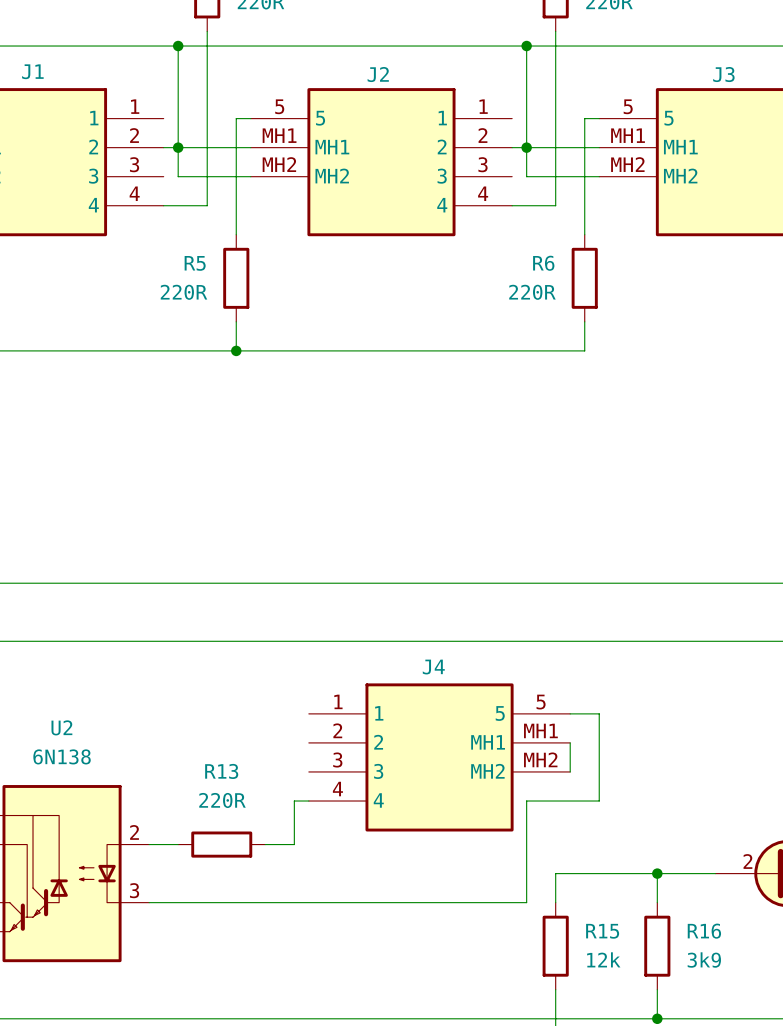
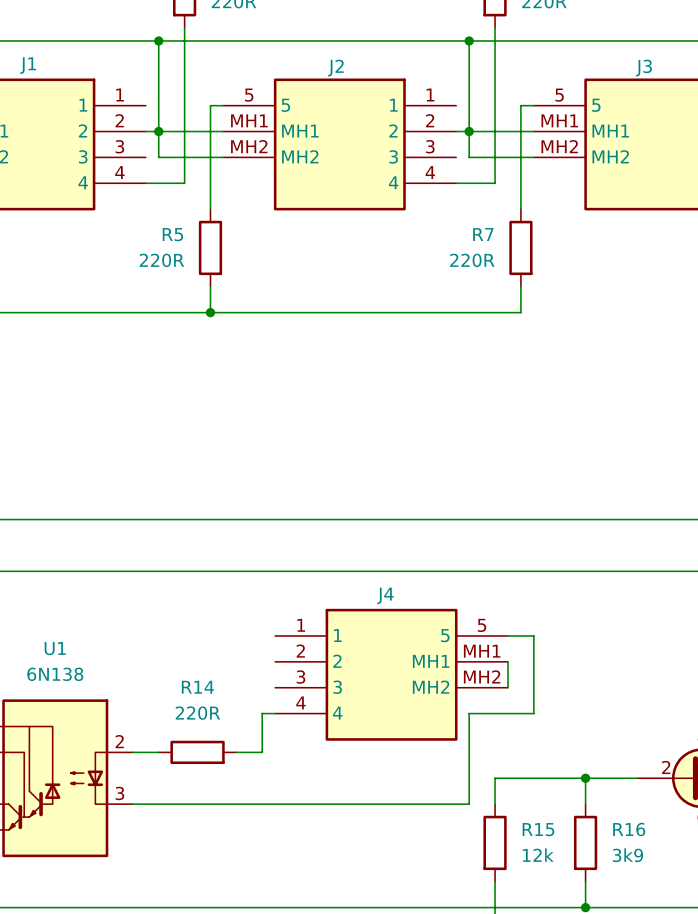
R6 name: R6 (543, 263) -> R7 (483, 234)
U2 name: U2 (61, 727) -> U1 (55, 648)
R13 name: R13 (221, 771) -> R14 (197, 687)

